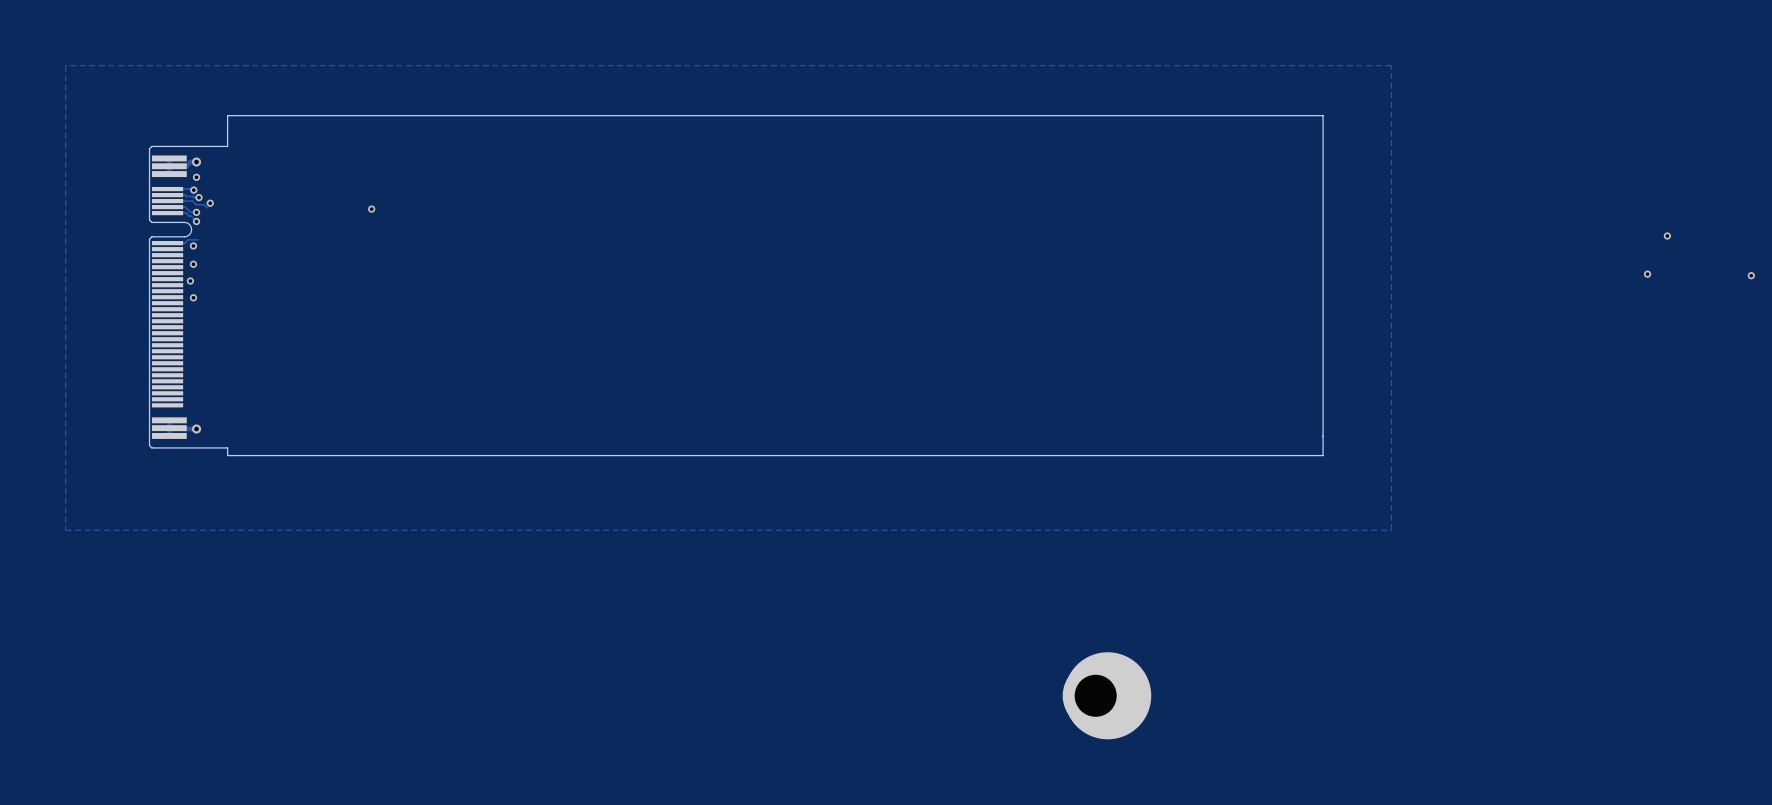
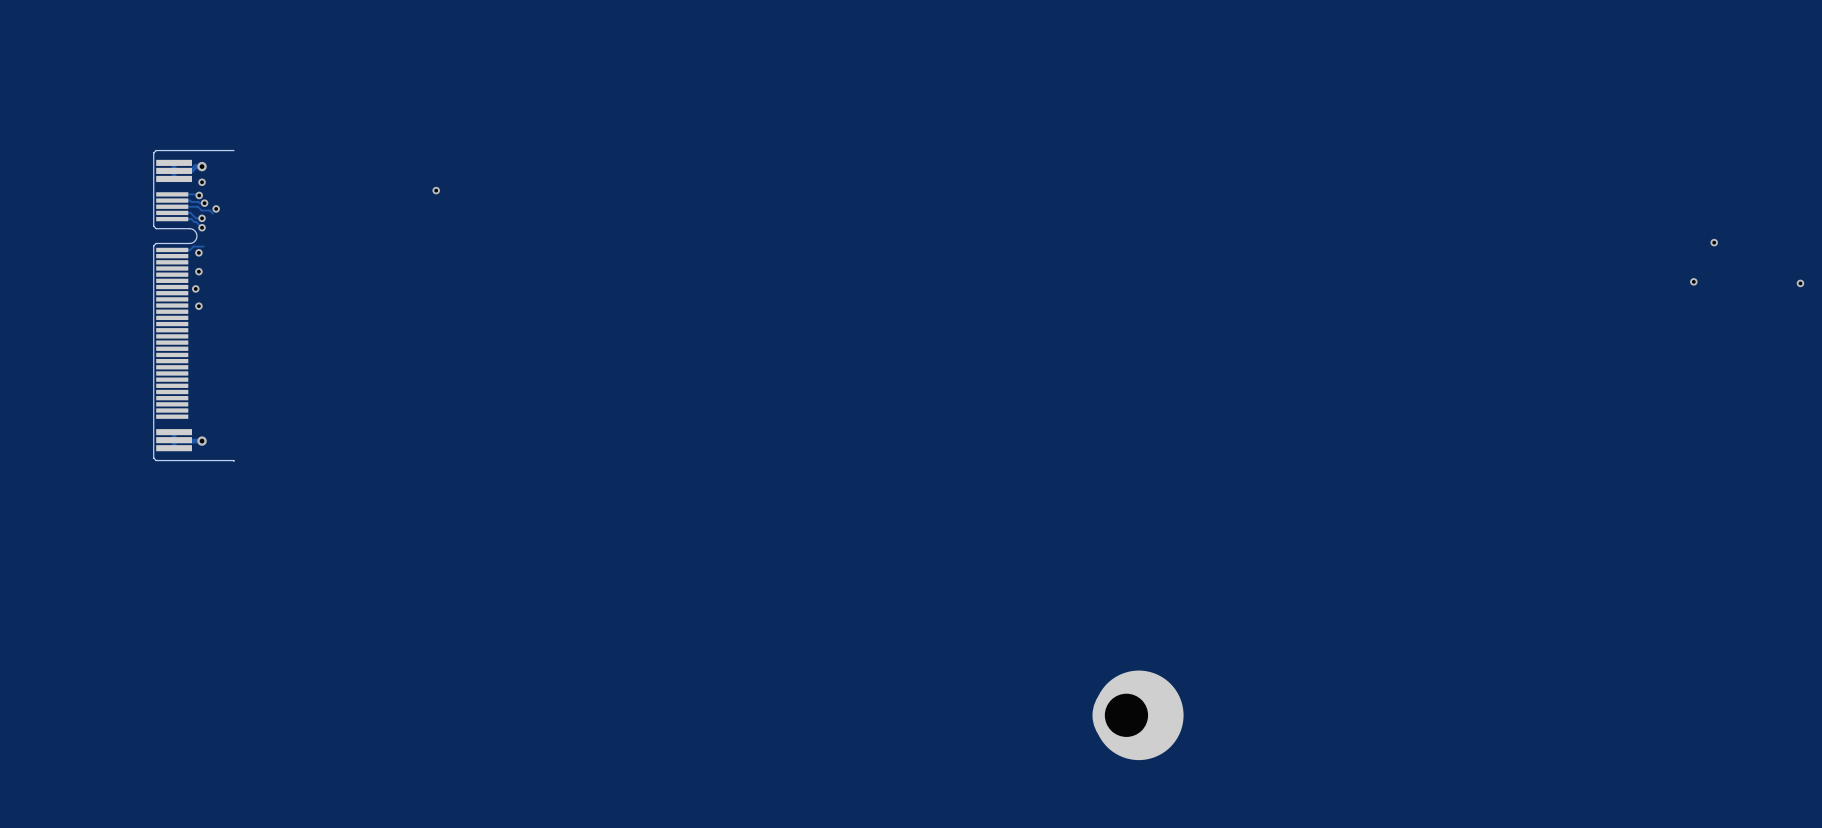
zone outline: (1391, 65) (1391, 530) (65, 530) (65, 65) (1391, 65) -> none
board edge: (227, 146) (227, 115) (1323, 115) (1323, 455) (227, 455) (227, 447) -> (233, 461) (233, 460)
via position: (371, 209) -> (436, 190)

